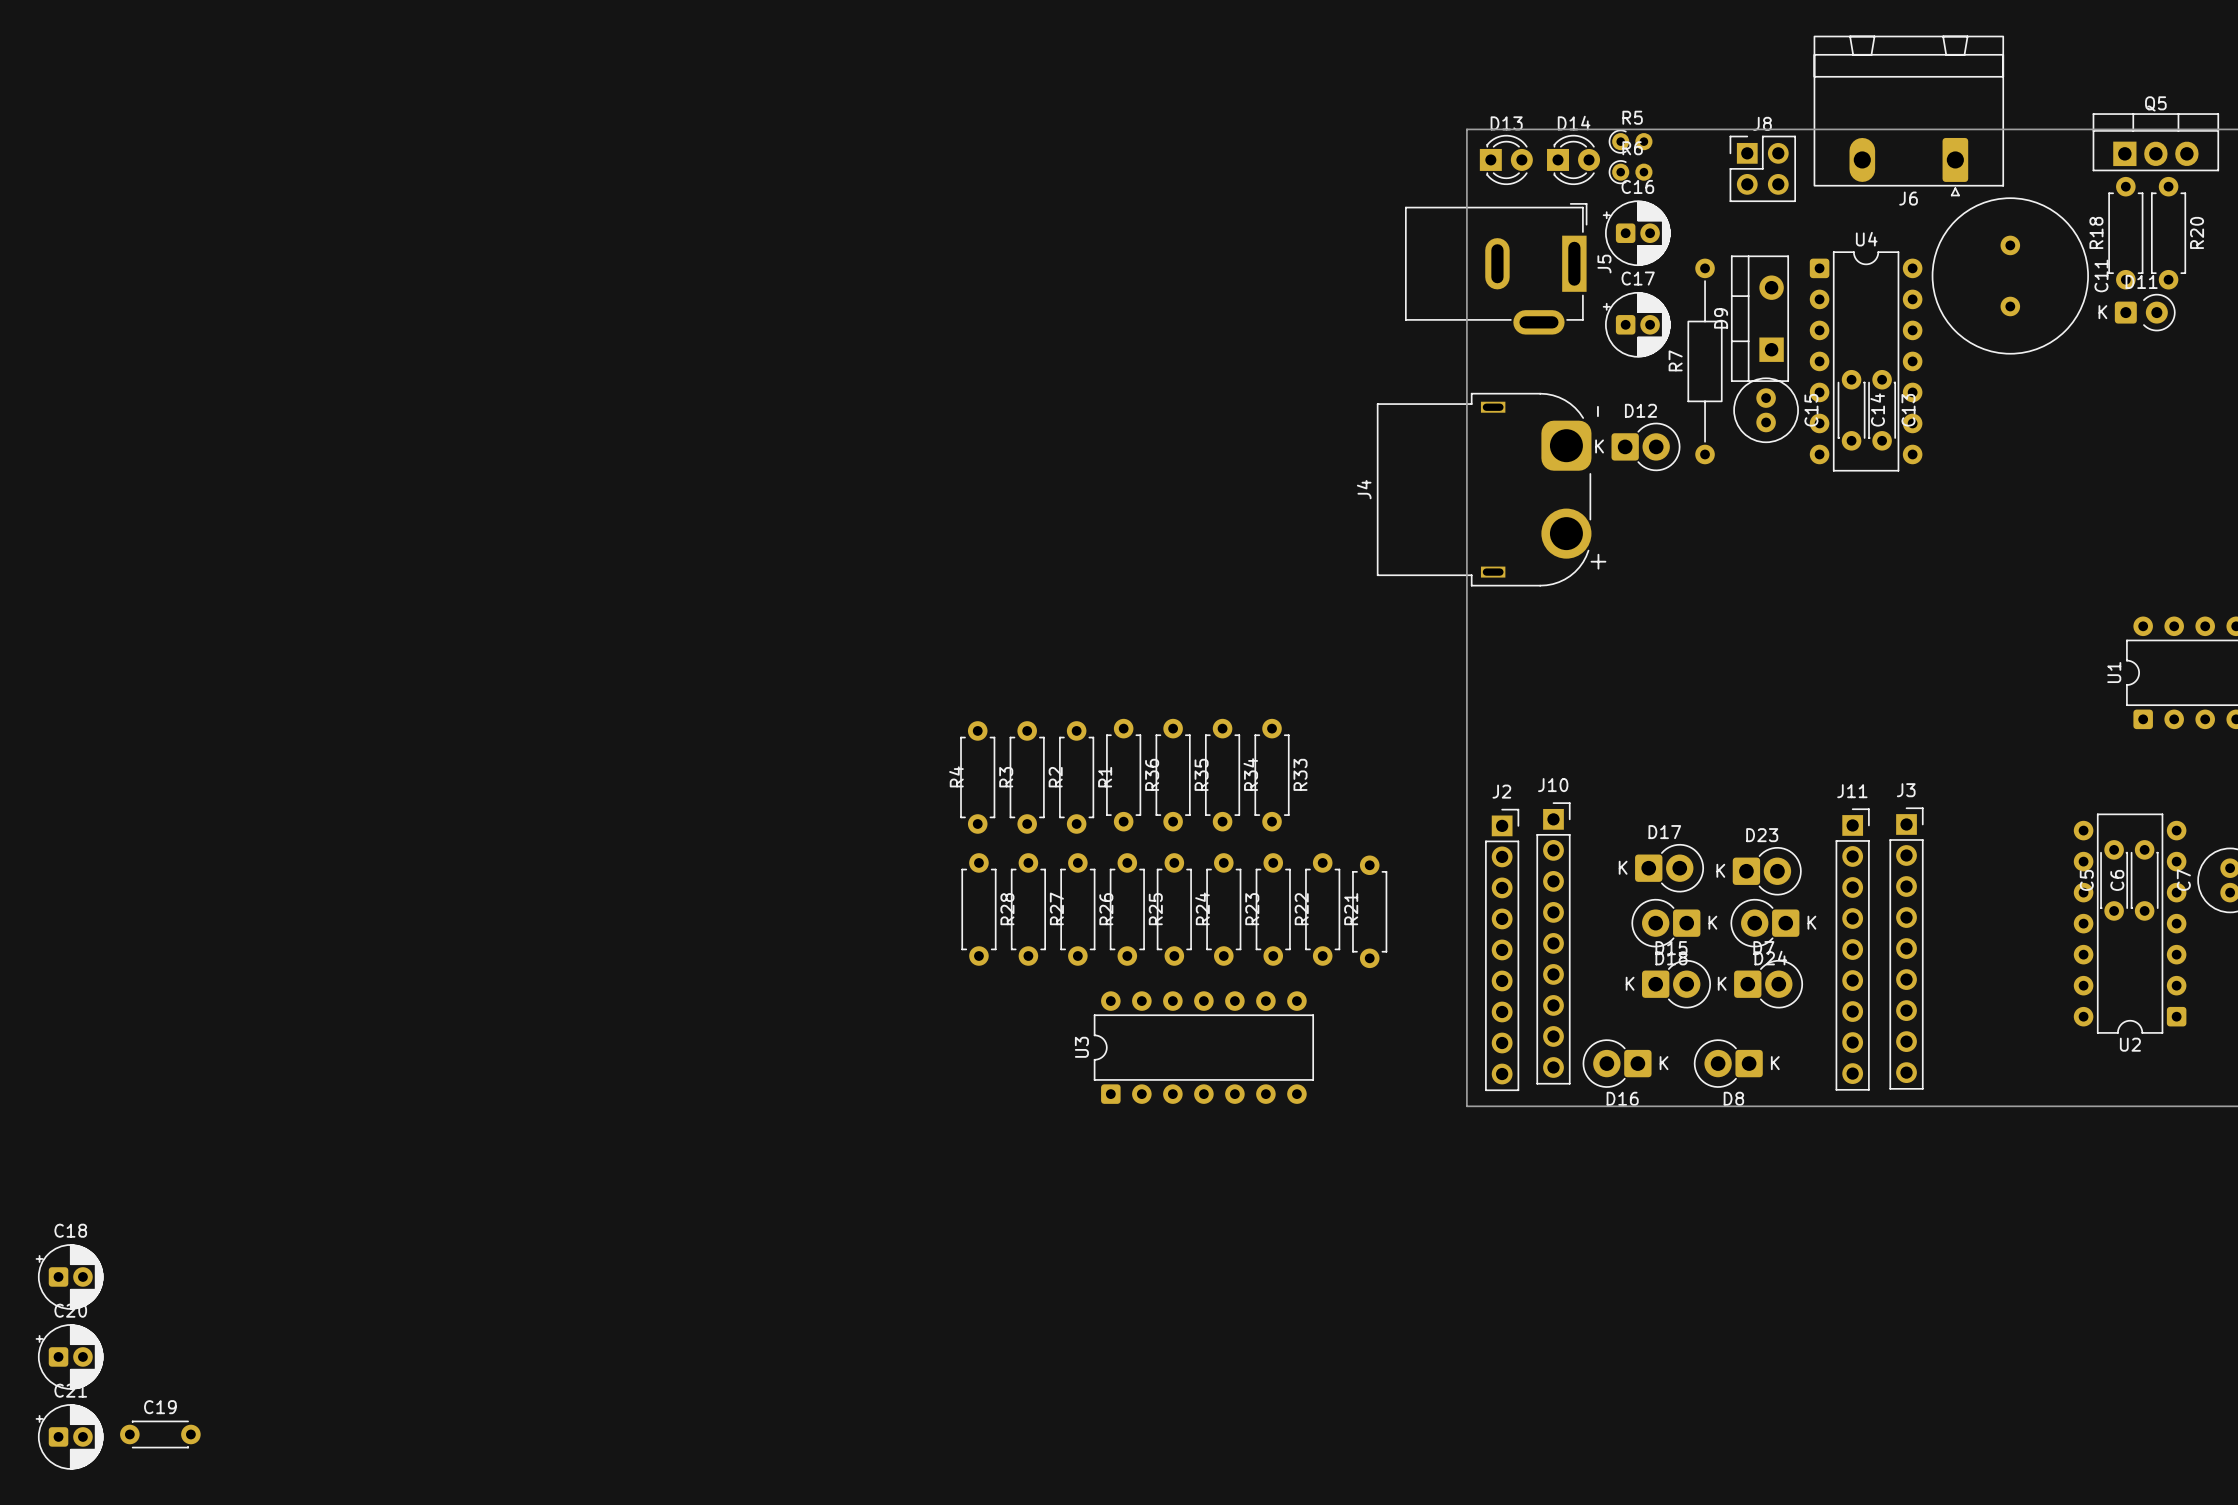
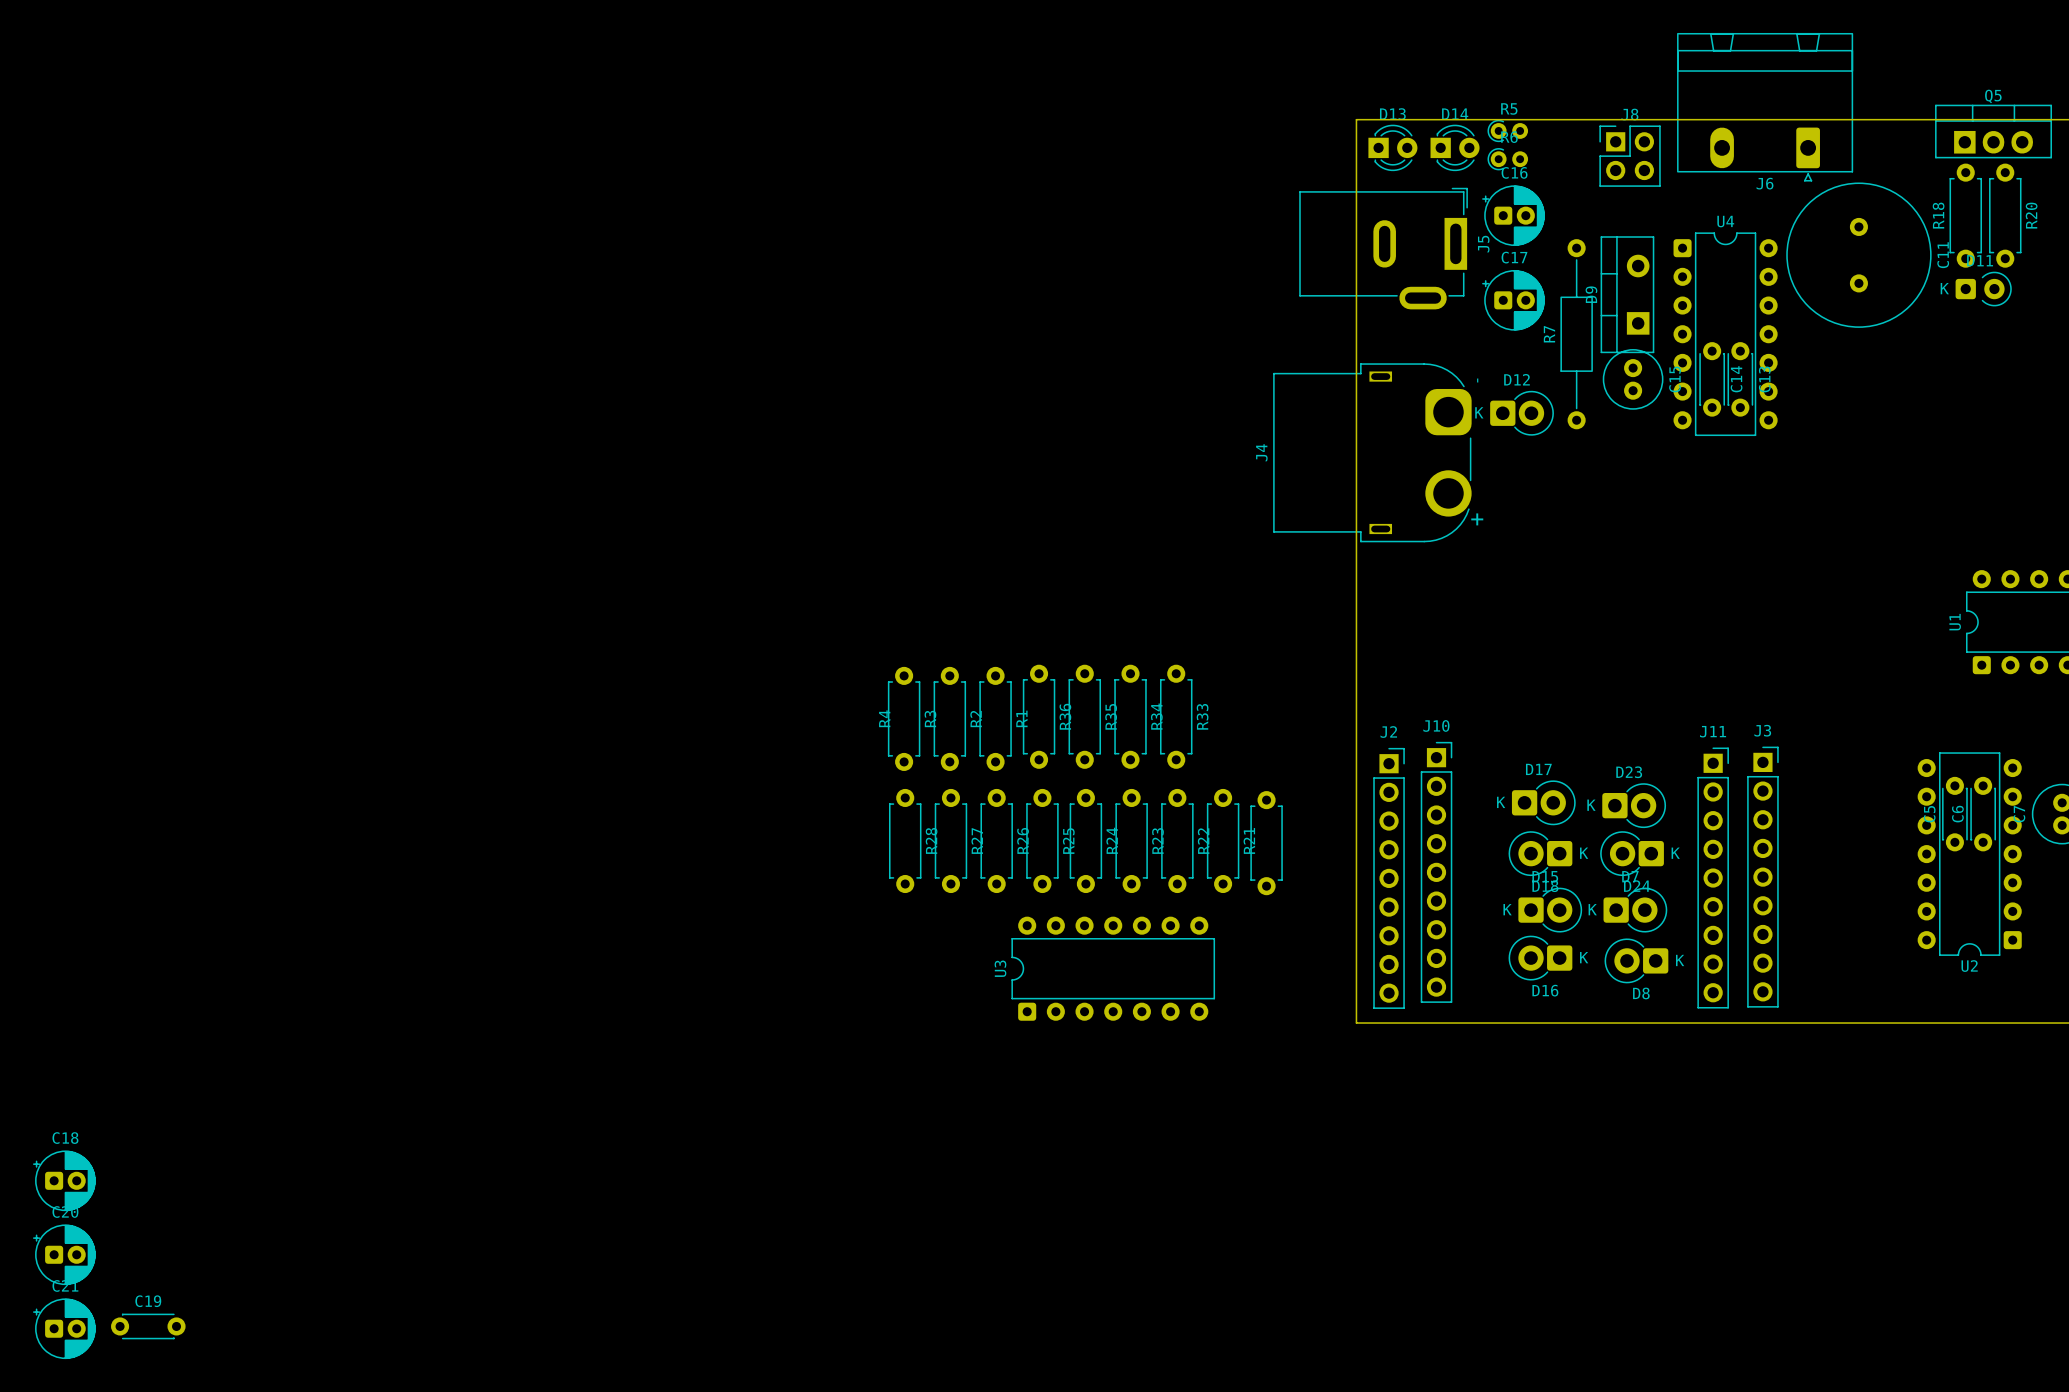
D16 position: (1617, 1063) -> (1540, 958)
D8 position: (1728, 1063) -> (1636, 960)

